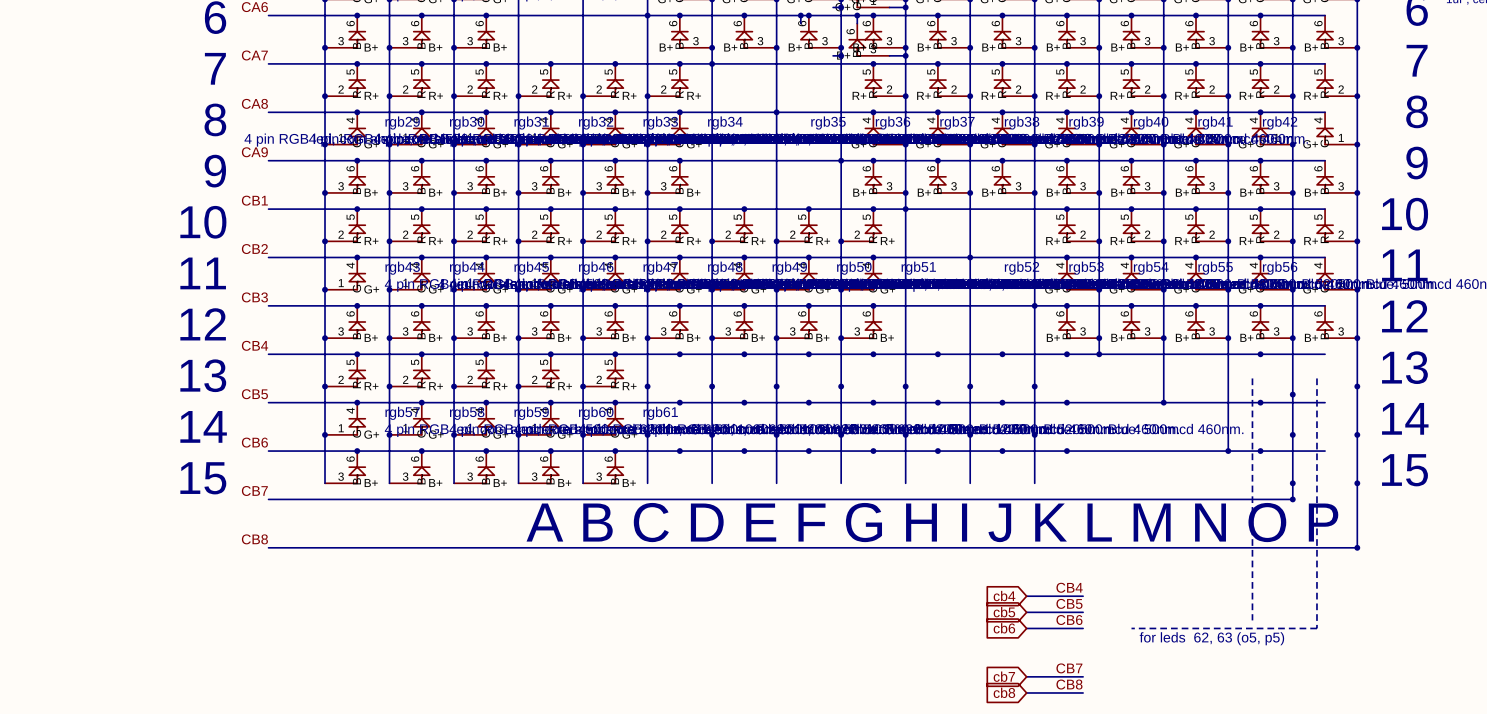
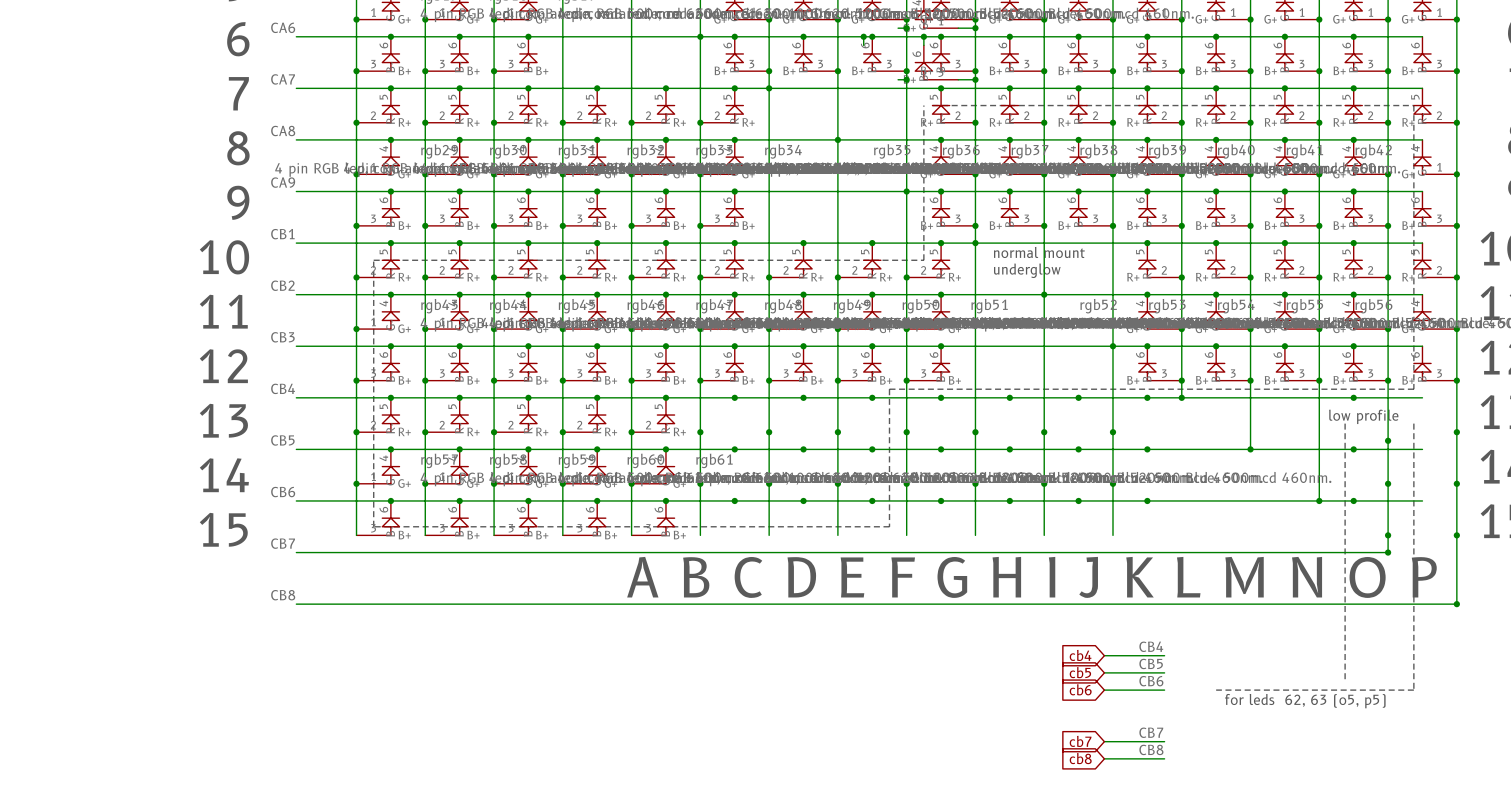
line: none -> (923, 105) (923, 260) (373, 260) (373, 526) (889, 526) (889, 389) (1413, 389) (1413, 105) (932, 105)
text: none -> normal mount (1039, 252)
text: none -> underglow (1027, 270)
text: none -> low profile (1363, 416)

